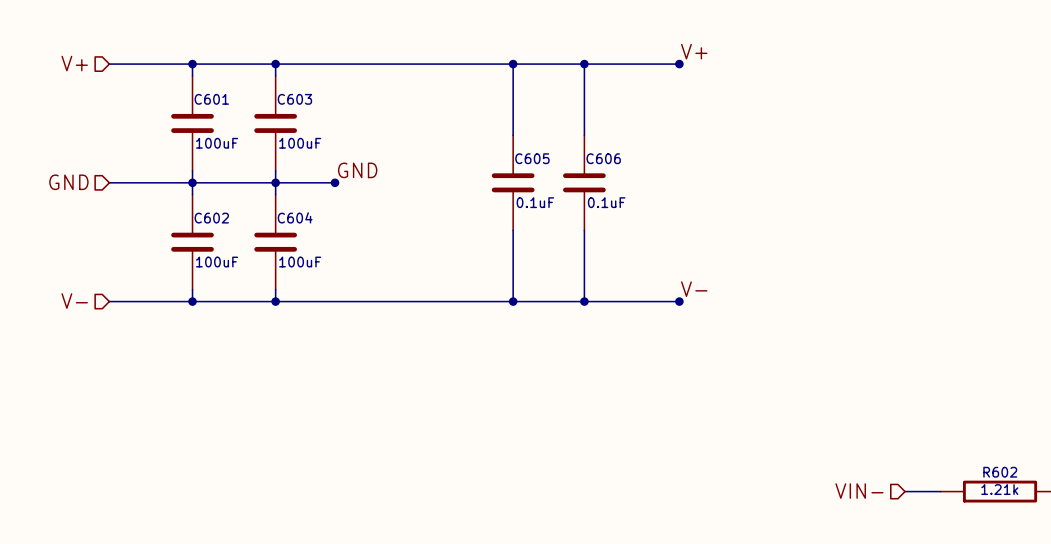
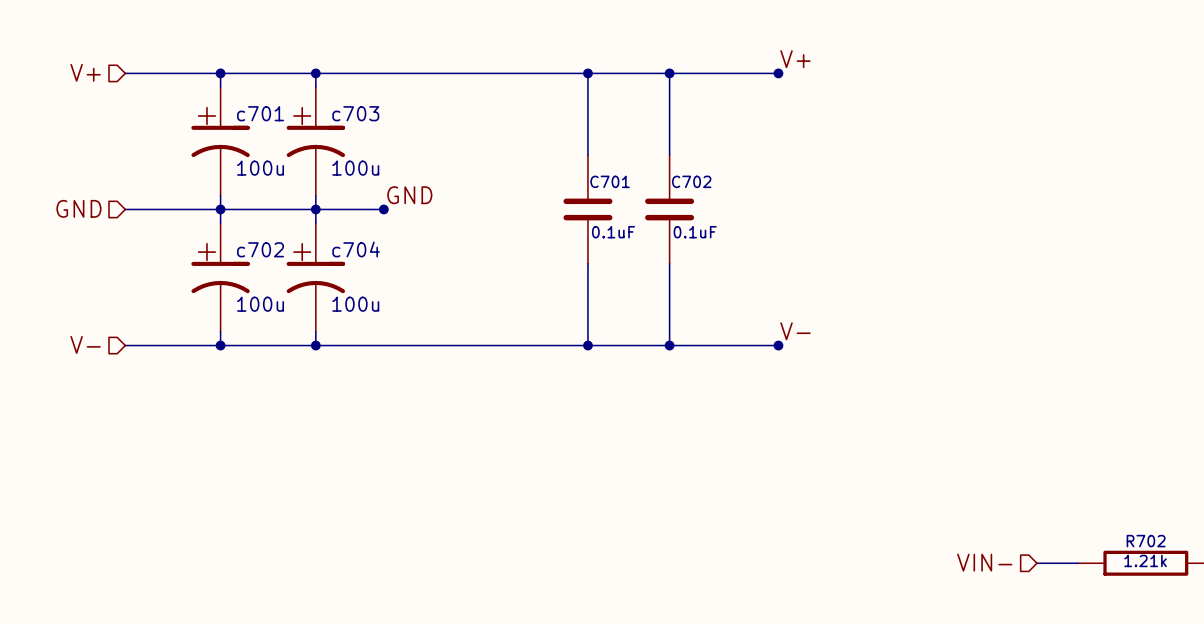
C601: 100uF (192, 123) -> none
c701: none -> 100u (220, 141)
C603: 100uF (275, 123) -> none
c703: none -> 100u (315, 141)
C605 name: C605 (532, 158) -> C701 (610, 181)
C606 name: C606 (603, 158) -> C702 (691, 181)
C602: 100uF (192, 242) -> none
c702: none -> 100u (220, 277)
C604: 100uF (275, 242) -> none
c704: none -> 100u (315, 277)
R602 name: R602 (1000, 472) -> R702 (1146, 541)

